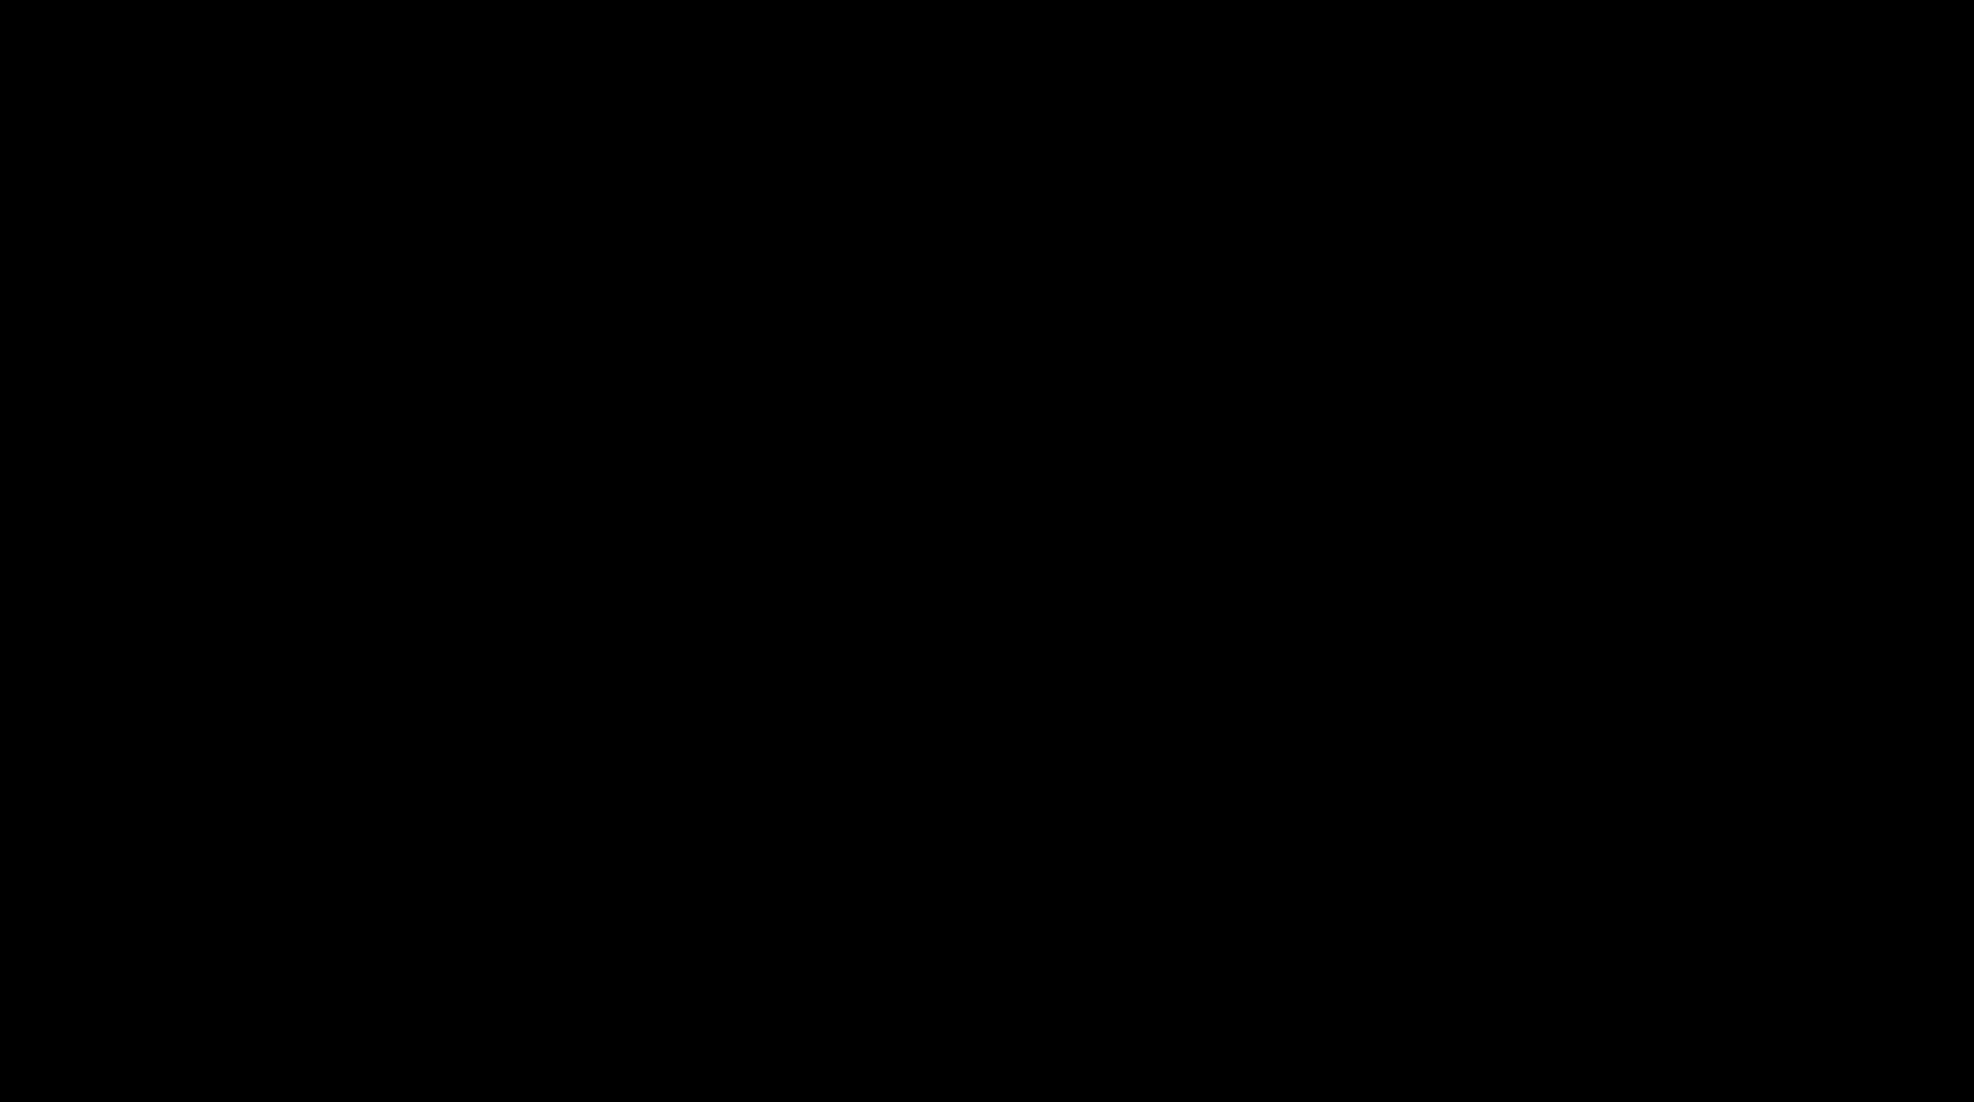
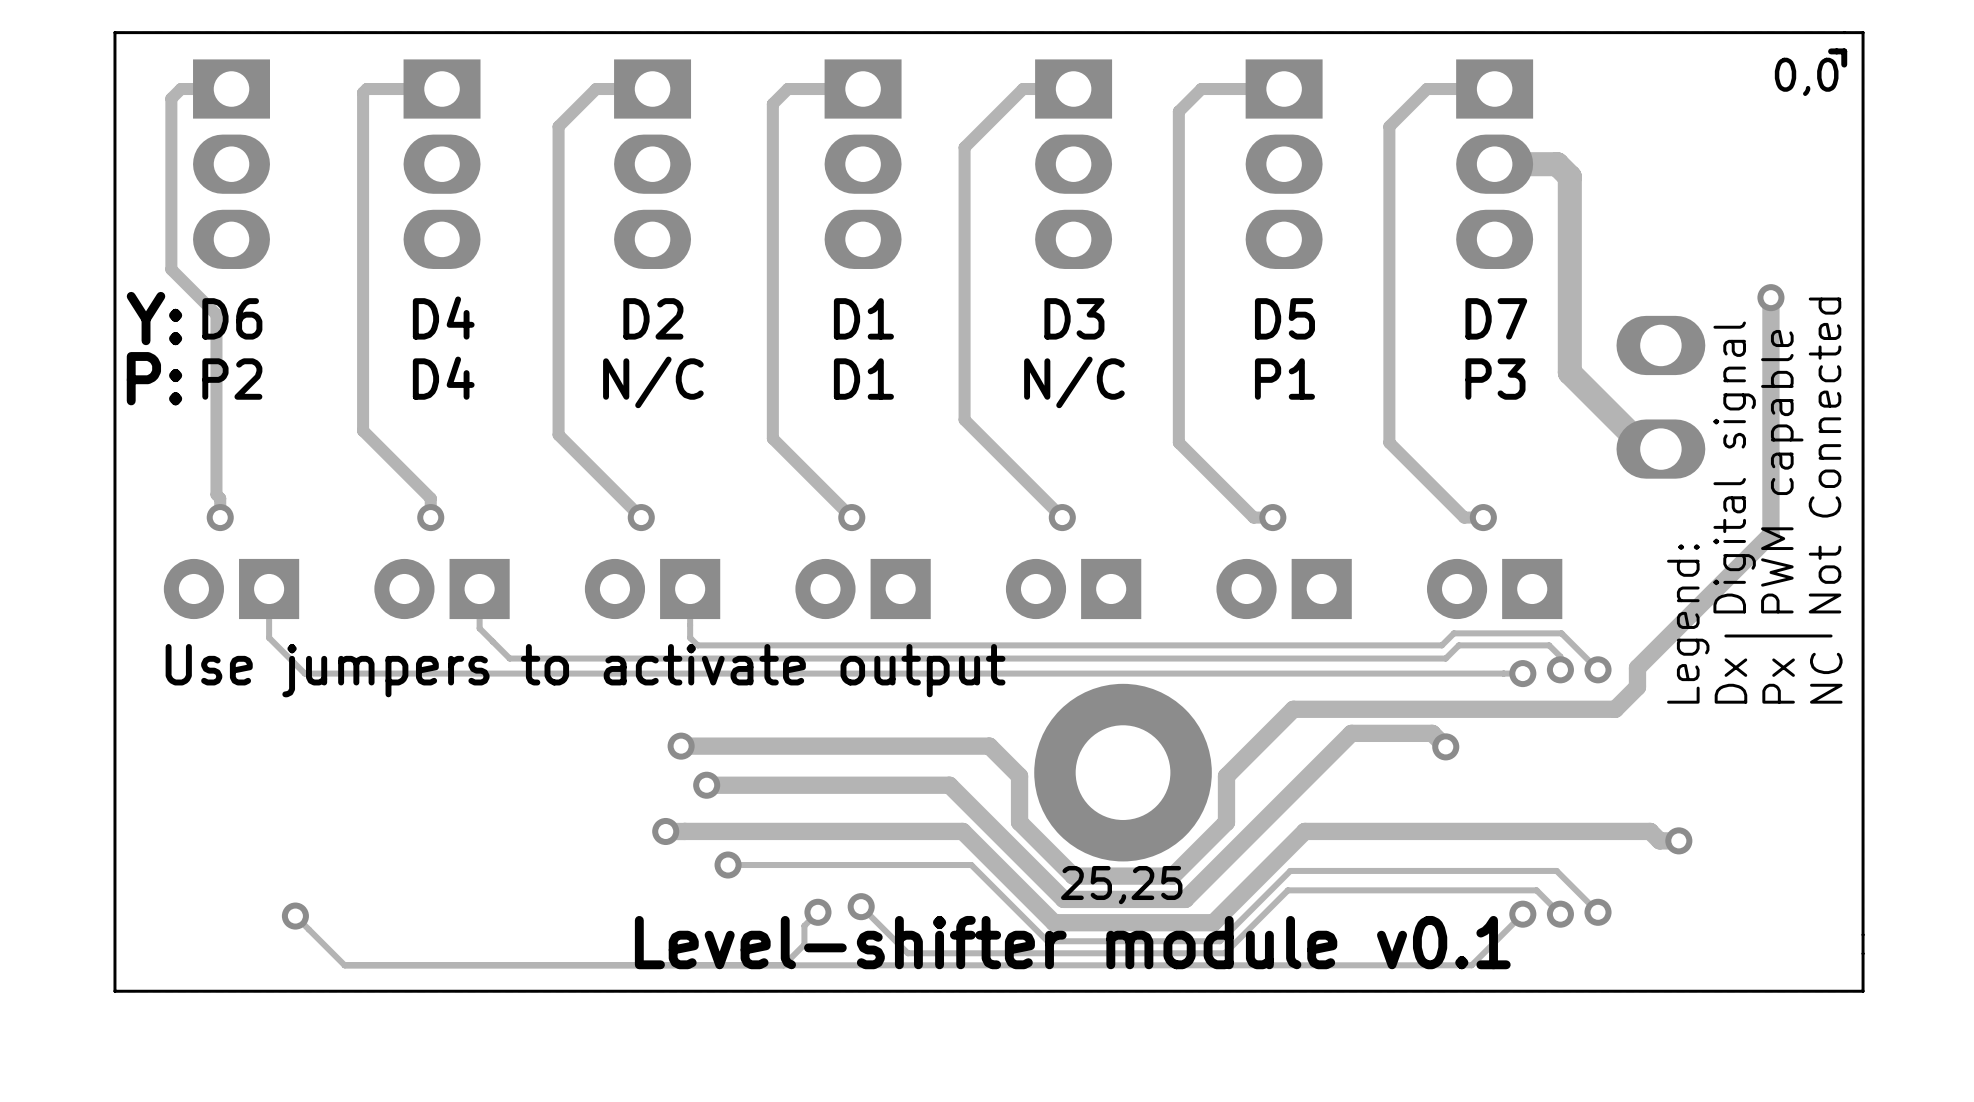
board edge: none -> (1863, 32) (1863, 991) (114, 991) (114, 32) (1863, 32)
line: none -> (1831, 51) (1844, 51) (1844, 64)
text: none -> 0,0 (1806, 76)
track: none -> (231, 89) (181, 89) (171, 98) (171, 269) (216, 314) (216, 494) (220, 498) (220, 517)
track: none -> (442, 89) (366, 89) (363, 92) (363, 430) (430, 498) (430, 517)
track: none -> (652, 89) (596, 89) (558, 126) (558, 434) (641, 517)
track: none -> (863, 89) (787, 89) (772, 104) (772, 438) (851, 517)
track: none -> (1073, 89) (1023, 89) (964, 147) (964, 419) (1062, 517)
track: none -> (1284, 89) (1201, 89) (1178, 111) (1178, 442) (1253, 517) (1272, 517)
track: none -> (1494, 89) (1426, 89) (1389, 126) (1389, 442) (1464, 517) (1483, 517)
part: none -> (231, 164)
part: none -> (442, 164)
part: none -> (652, 164)
part: none -> (863, 164)
part: none -> (1073, 164)
part: none -> (1284, 164)
part: none -> (1494, 164)
track: none -> (1503, 164) (1494, 164) (1557, 164) (1569, 176) (1569, 372) (1646, 449) (1660, 449)
track: none -> (1770, 297) (1770, 534) (1637, 667) (1637, 687) (1615, 709) (1293, 709) (1226, 776) (1226, 822) (1172, 876) (1073, 876) (1019, 822) (1019, 776) (989, 746) (681, 746)
via: none -> (1770, 297)
text: none -> Y: (154, 318)
text: none -> D6 (232, 318)
text: none -> D4 (443, 318)
text: none -> D2 (653, 318)
text: none -> D1 (863, 318)
text: none -> D3 (1074, 318)
text: none -> D5 (1284, 318)
text: none -> D7 (1496, 318)
text: none -> P: (154, 378)
text: none -> D4 (443, 378)
text: none -> P2 (232, 379)
text: none -> D1 (863, 379)
text: none -> P1 (1284, 379)
text: none -> P3 (1495, 379)
text: none -> N/C (653, 382)
text: none -> N/C (1074, 382)
part: none -> (1660, 397)
text: none -> Not Connected (1825, 455)
text: none -> Digital signal (1734, 467)
text: none -> PWM capable (1782, 471)
via: none -> (220, 517)
via: none -> (430, 517)
via: none -> (641, 517)
via: none -> (851, 517)
via: none -> (1062, 517)
via: none -> (1272, 517)
via: none -> (1483, 517)
part: none -> (231, 589)
track: none -> (269, 589) (269, 637) (304, 673) (1522, 673)
part: none -> (442, 589)
track: none -> (479, 589) (479, 628) (509, 658) (1445, 658) (1458, 645) (1549, 645) (1560, 656) (1560, 669)
part: none -> (652, 589)
track: none -> (690, 589) (690, 637) (697, 645) (1441, 645) (1453, 633) (1561, 633) (1598, 669)
part: none -> (863, 589)
part: none -> (1073, 589)
part: none -> (1284, 589)
part: none -> (1494, 589)
text: none -> Legend: (1688, 623)
line: none -> (1831, 635) (1725, 635)
via: none -> (1560, 669)
via: none -> (1598, 669)
text: none -> Use jumpers to activate output (585, 670)
via: none -> (1522, 673)
text: none -> NC (1826, 678)
text: none -> Dx (1730, 681)
text: none -> Px (1778, 681)
via: none -> (681, 746)
track: none -> (1445, 746) (1432, 733) (1351, 733) (1185, 899) (1063, 899) (949, 785) (706, 785)
via: none -> (1445, 746)
25,25: none -> (1123, 772)
via: none -> (706, 785)
track: none -> (665, 831) (962, 831) (1054, 922) (1213, 922) (1304, 831) (1650, 831) (1659, 840) (1678, 840)
via: none -> (665, 831)
via: none -> (1678, 840)
track: none -> (728, 865) (971, 865) (1047, 941) (1220, 941) (1290, 870) (1556, 870) (1598, 912)
via: none -> (728, 865)
track: none -> (861, 906) (907, 953) (1224, 953) (1287, 890) (1536, 890) (1560, 914)
via: none -> (861, 906)
track: none -> (817, 912) (804, 925) (804, 944) (783, 965)
via: none -> (817, 912)
via: none -> (1598, 912)
track: none -> (1522, 914) (1471, 965) (344, 965) (295, 916)
via: none -> (1522, 914)
via: none -> (1560, 914)
via: none -> (295, 916)
text: none -> Level-shifter module v0.1 (1072, 942)

